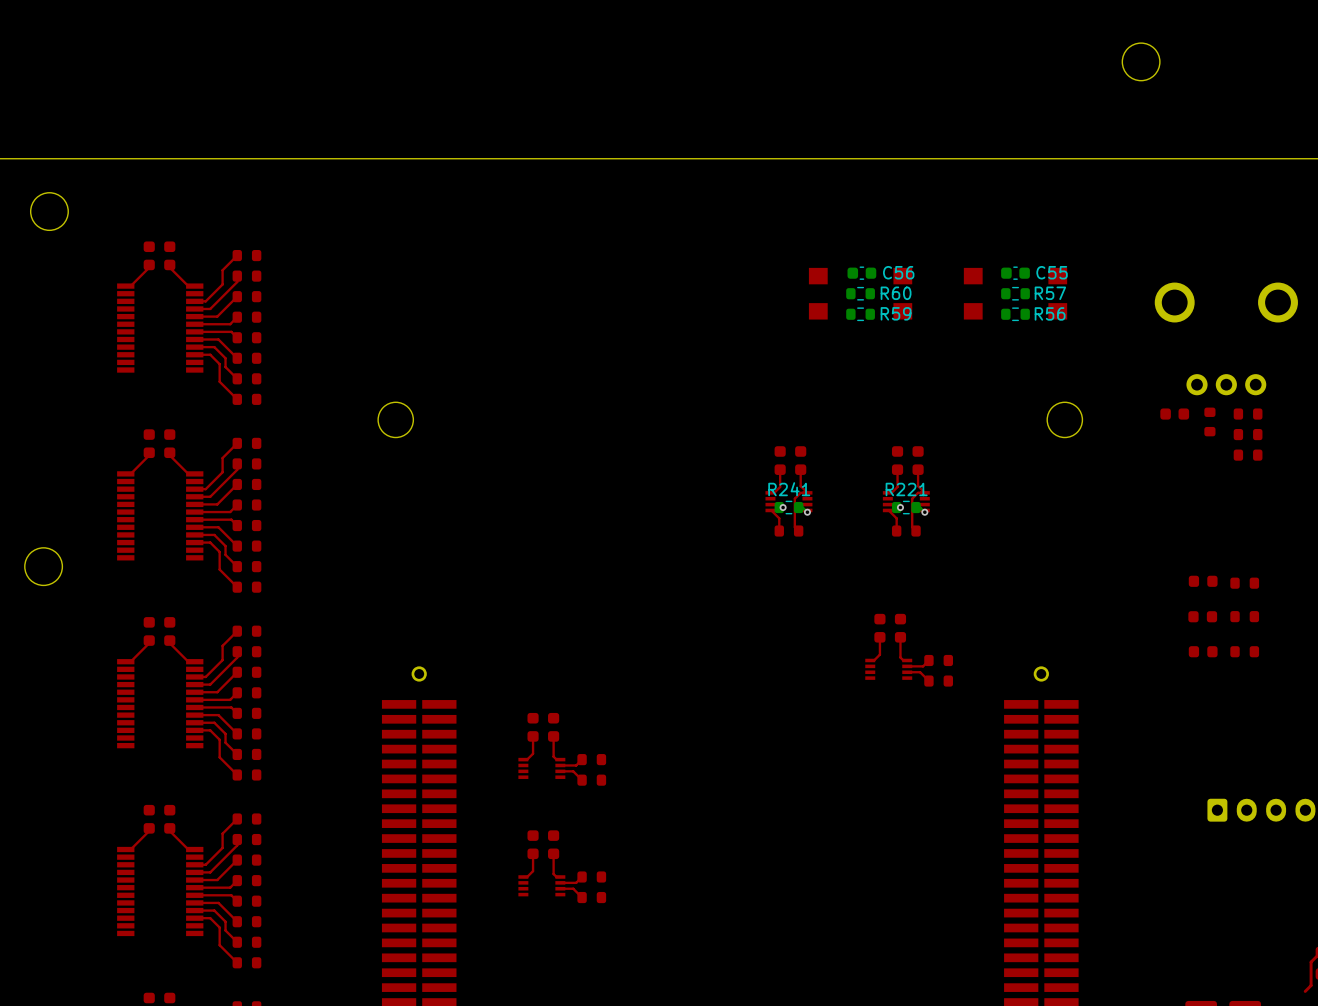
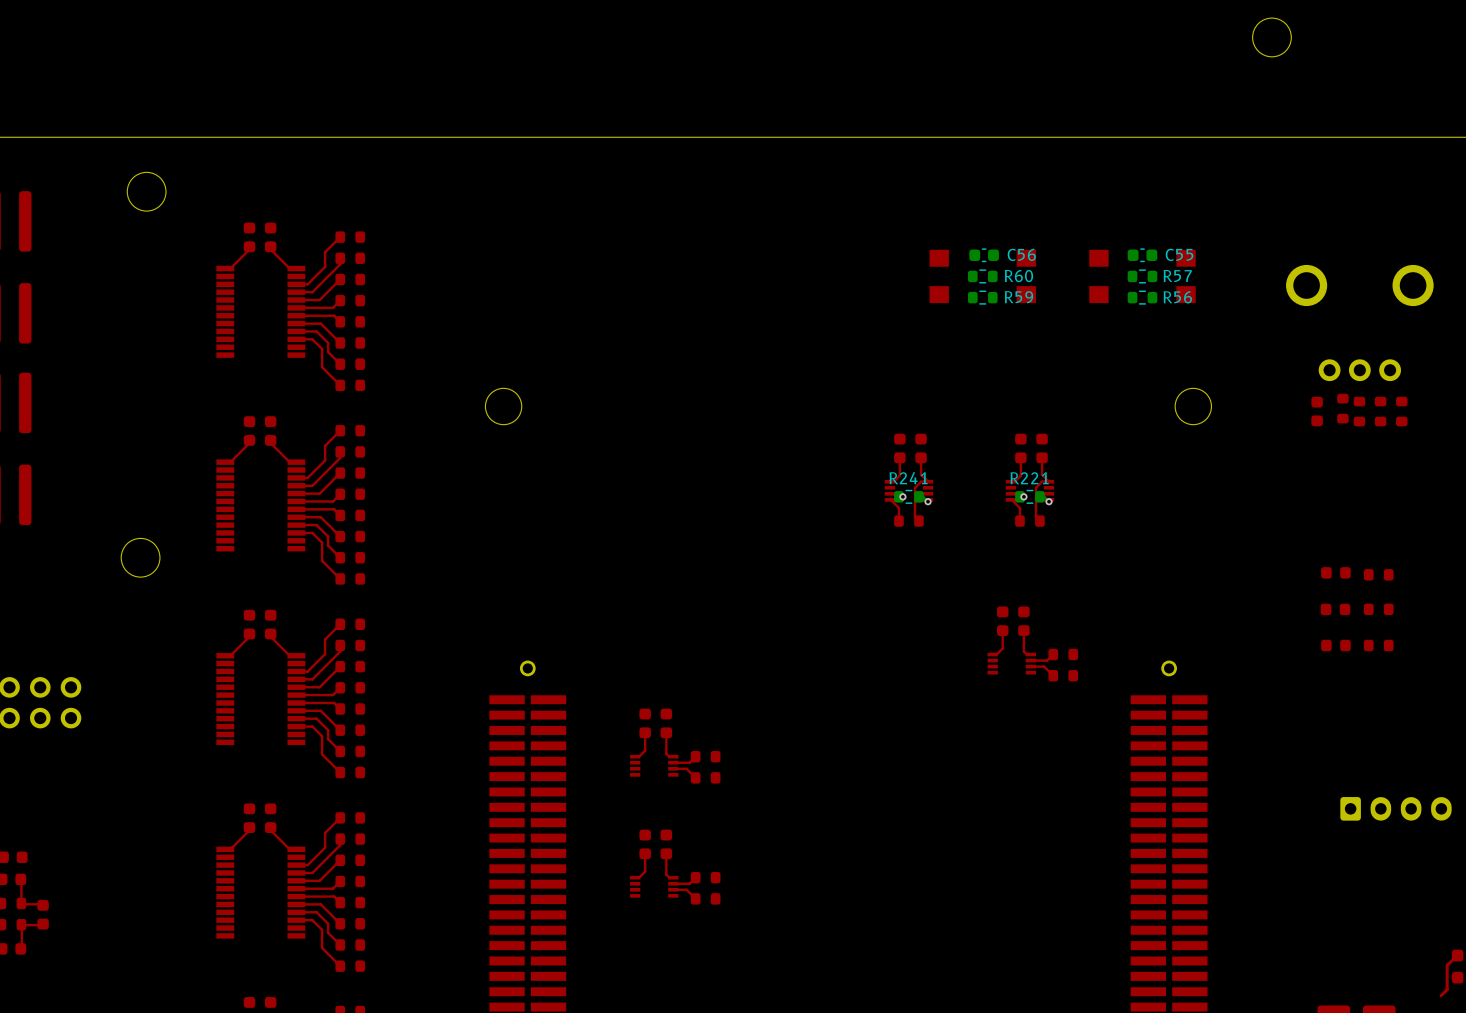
part rotation: 0° (1174, 414) -> 90° clockwise (1317, 411)
part: (1248, 414) -> none
part: none -> (1359, 411)
part: none -> (1380, 411)
part: none -> (1401, 411)
part: (1248, 434) -> none
part: (1248, 455) -> none

